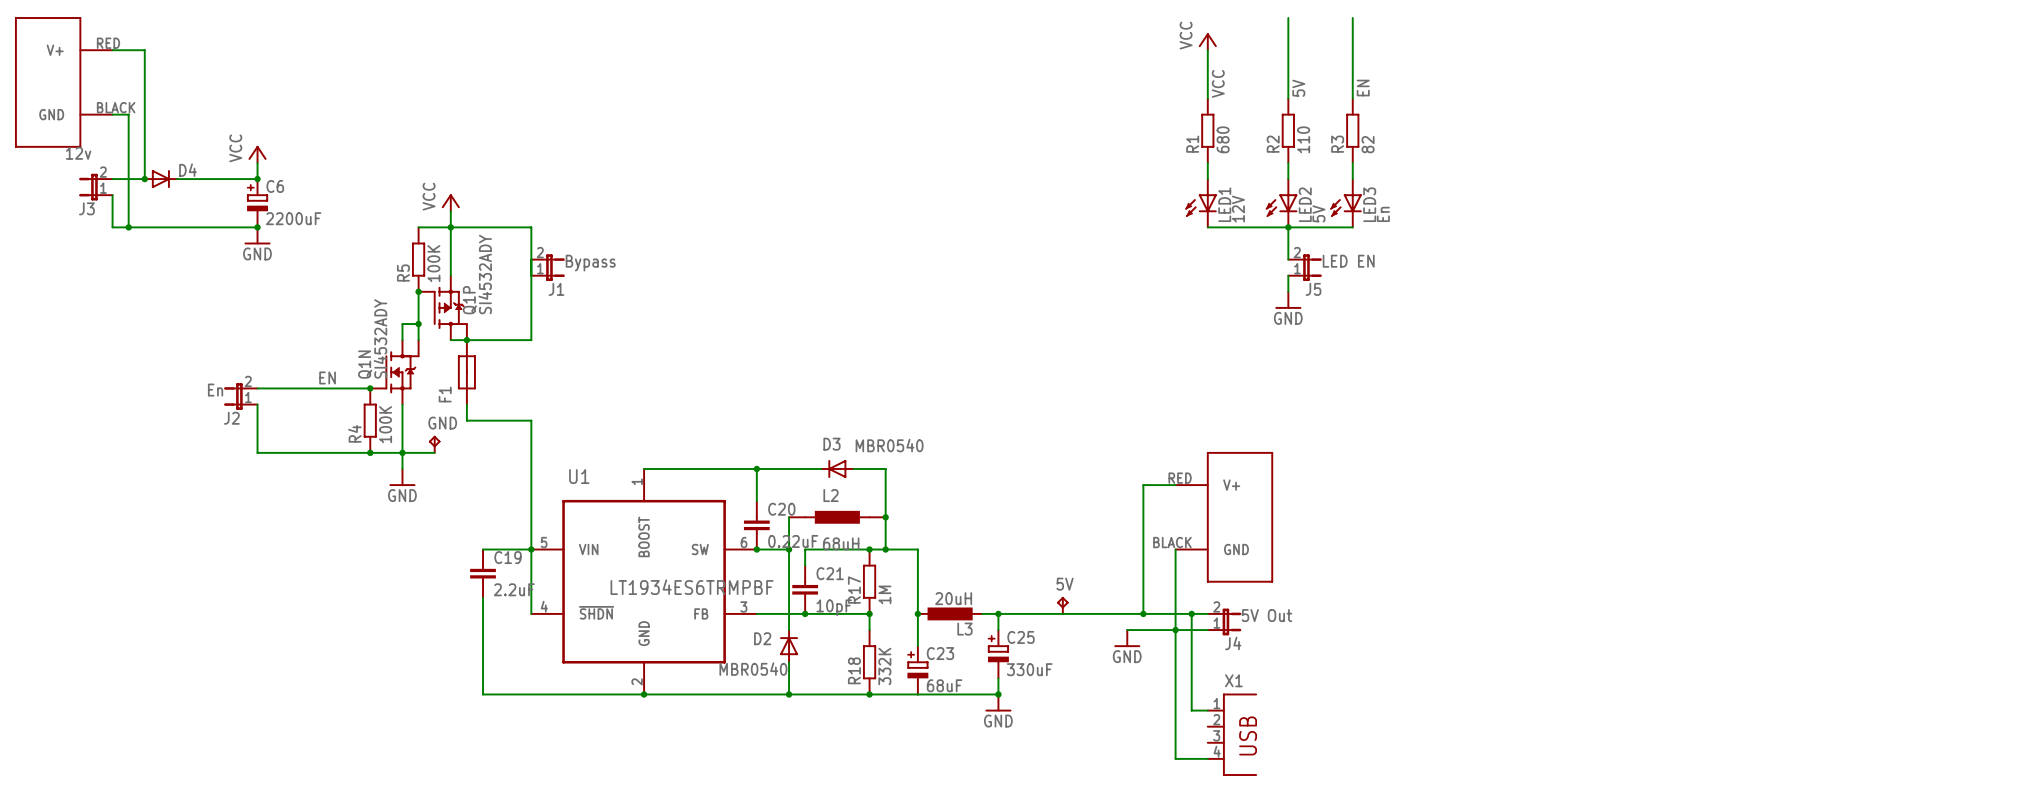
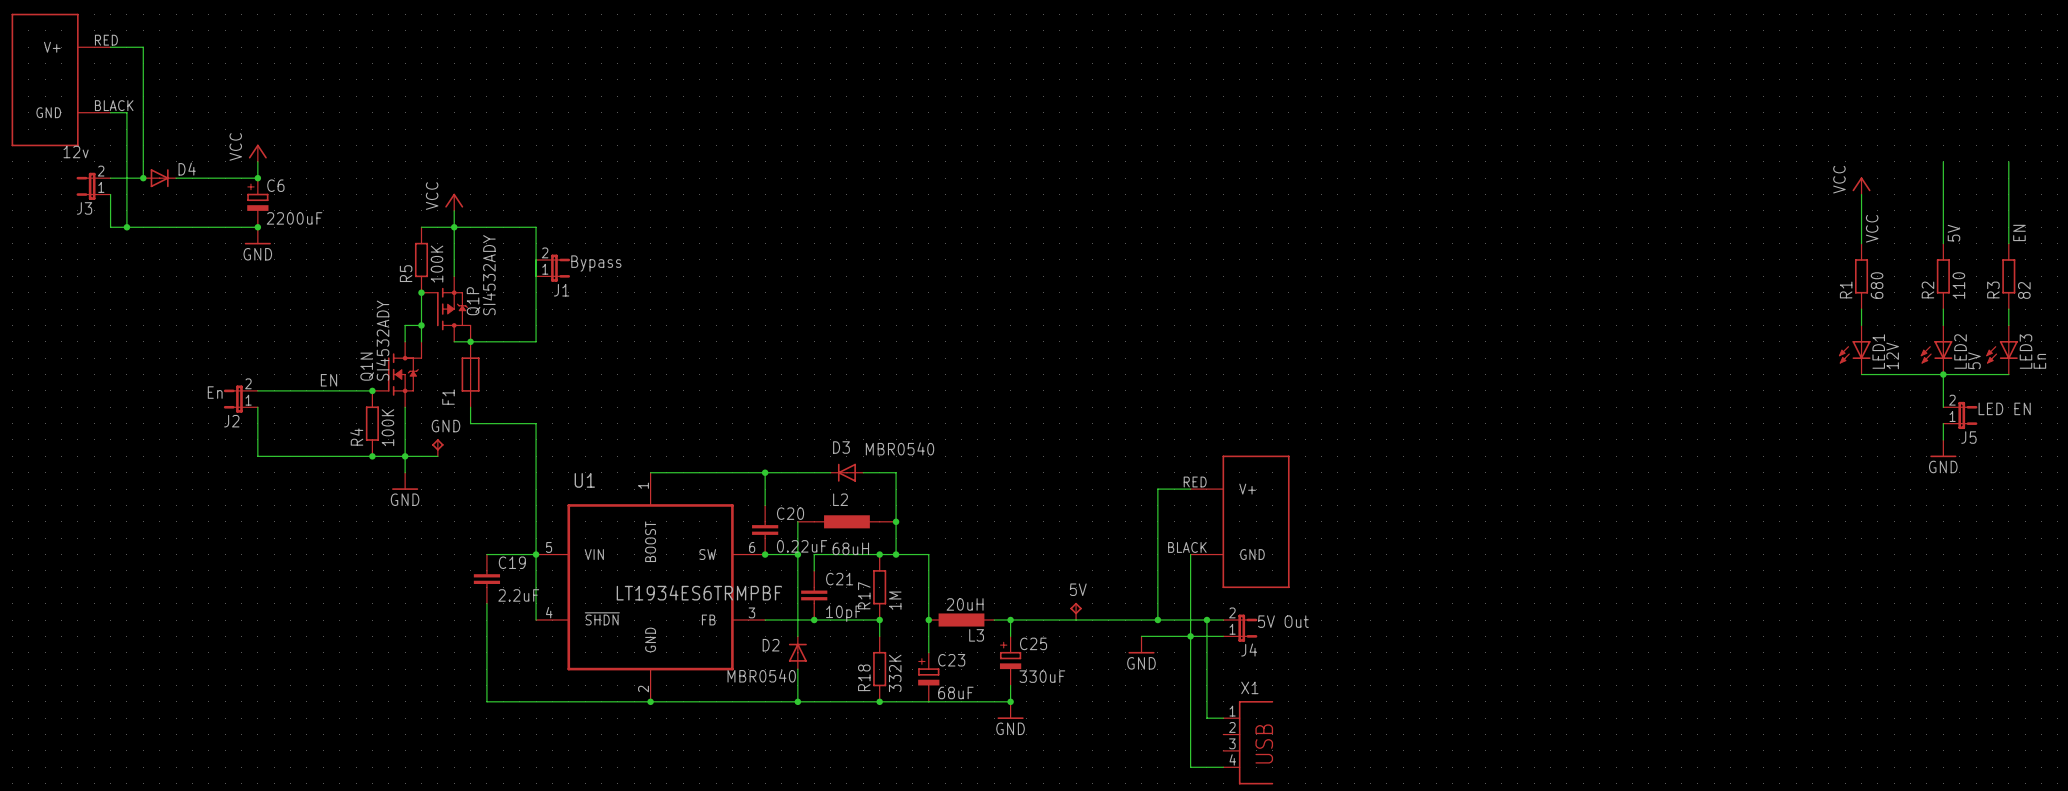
wire: (1288, 18) (1288, 98) -> none
wire: (1352, 18) (1352, 98) -> none
power symbol: VCC (1207, 41) -> none
wire: (1207, 50) (1207, 98) -> none
label: VCC (1218, 83) -> none
label: 5V (1298, 88) -> none
label: EN (1363, 88) -> none
R1 position: (1207, 130) -> (1861, 276)
R2 position: (1288, 130) -> (1943, 276)
R3 position: (1352, 130) -> (2008, 276)
wire: (1207, 162) (1207, 179) -> none
wire: (1288, 162) (1288, 179) -> none
wire: (1352, 162) (1352, 179) -> none
wire: none -> (1943, 161) (1943, 243)
wire: none -> (2008, 161) (2008, 243)
power symbol: none -> VCC (1861, 185)
wire: none -> (1861, 194) (1861, 243)
LED1 position: (1201, 203) -> (1854, 349)
LED2 position: (1281, 203) -> (1936, 349)
LED3 position: (1346, 203) -> (2002, 349)
wire: (1207, 227) (1352, 227) -> none
wire: (1288, 227) (1288, 259) -> none
junction: (1288, 227) -> none
label: none -> VCC (1872, 228)
label: none -> EN (2019, 232)
label: none -> 5V (1953, 233)
J5 position: (1305, 267) -> (1960, 415)
wire: (1288, 275) (1288, 291) -> none
power symbol: GND (1288, 300) -> none
wire: none -> (1861, 309) (1861, 325)
wire: none -> (1943, 309) (1943, 325)
wire: none -> (2008, 309) (2008, 325)
wire: none -> (1861, 374) (2008, 374)
wire: none -> (1943, 374) (1943, 407)
junction: none -> (1943, 374)
wire: none -> (1943, 423) (1943, 439)
power symbol: none -> GND (1943, 448)

